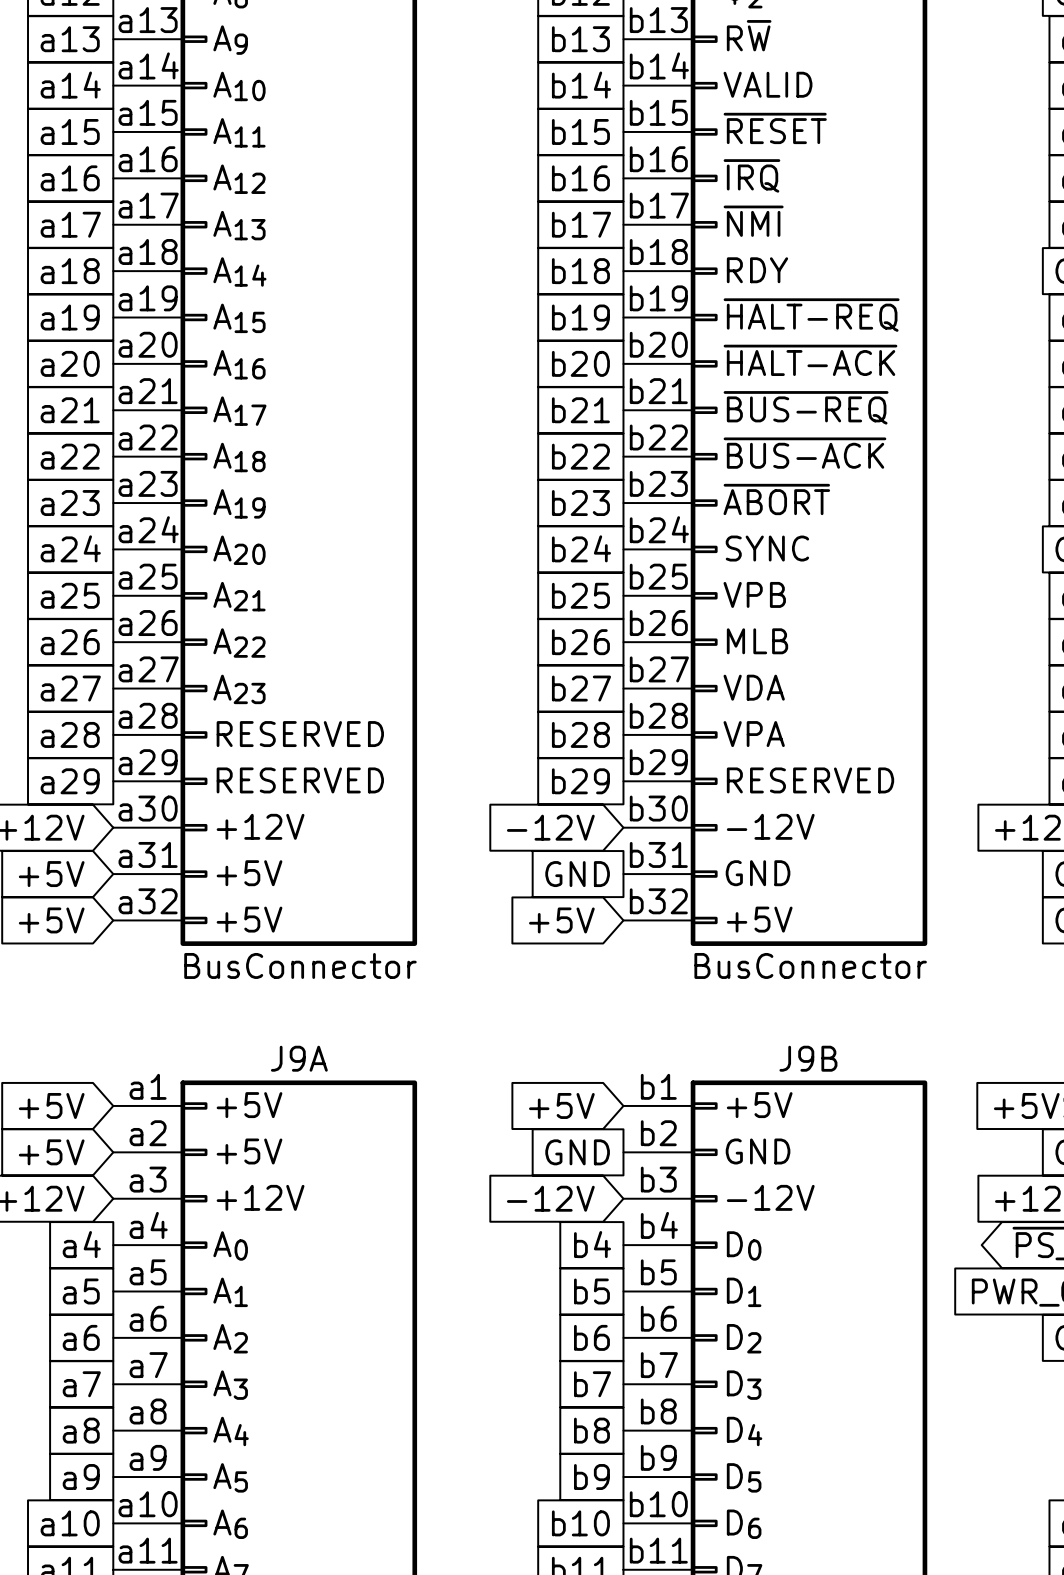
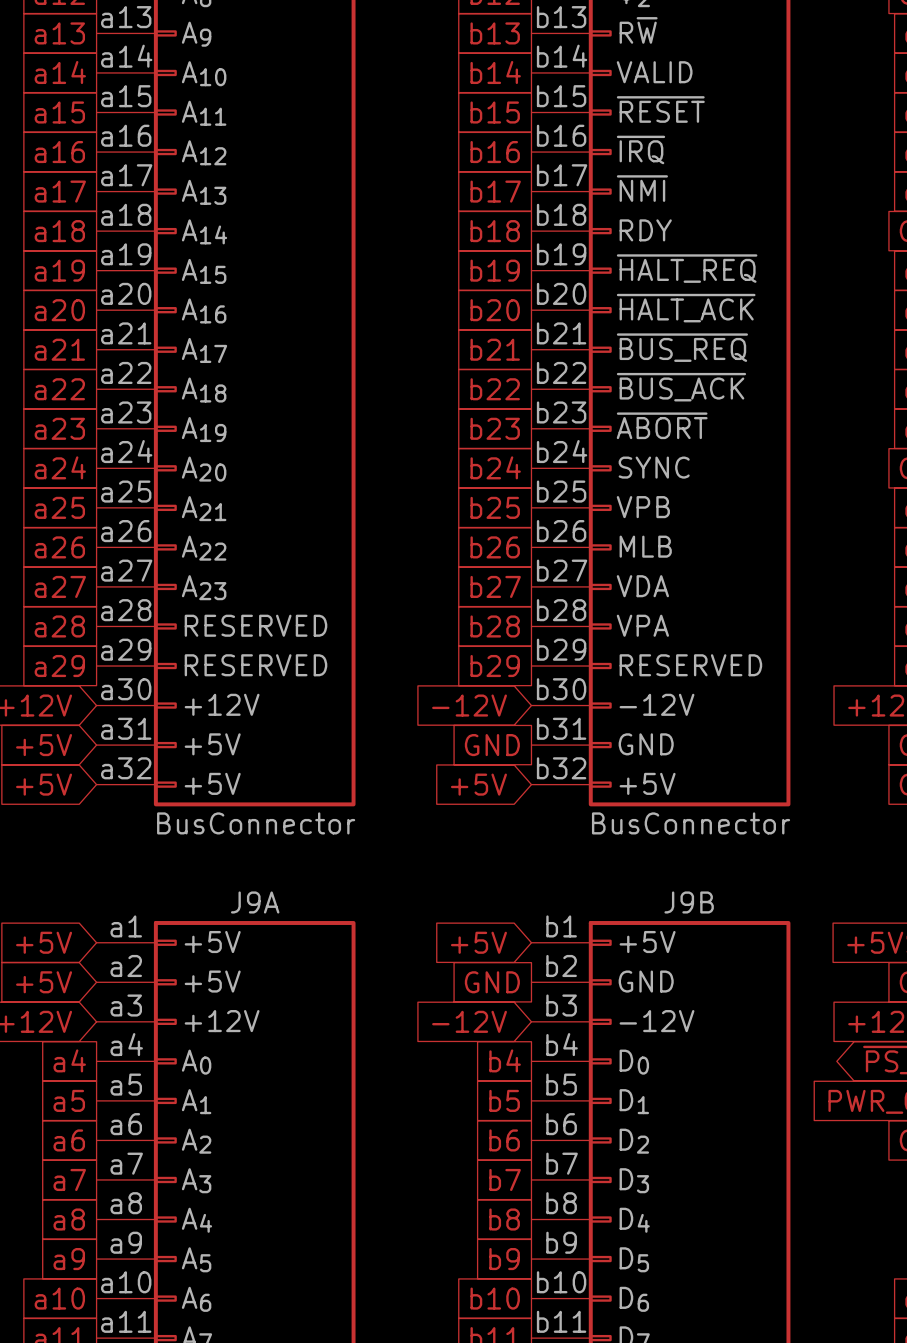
part pin name: ~{HALT-REQ} (811, 315) -> ~{HALT_REQ} (687, 268)
part pin name: ~{HALT-ACK} (810, 360) -> ~{HALT_ACK} (686, 308)
part pin name: ~{BUS-REQ} (806, 407) -> ~{BUS_REQ} (682, 347)
part pin name: ~{BUS-ACK} (804, 453) -> ~{BUS_ACK} (681, 387)

